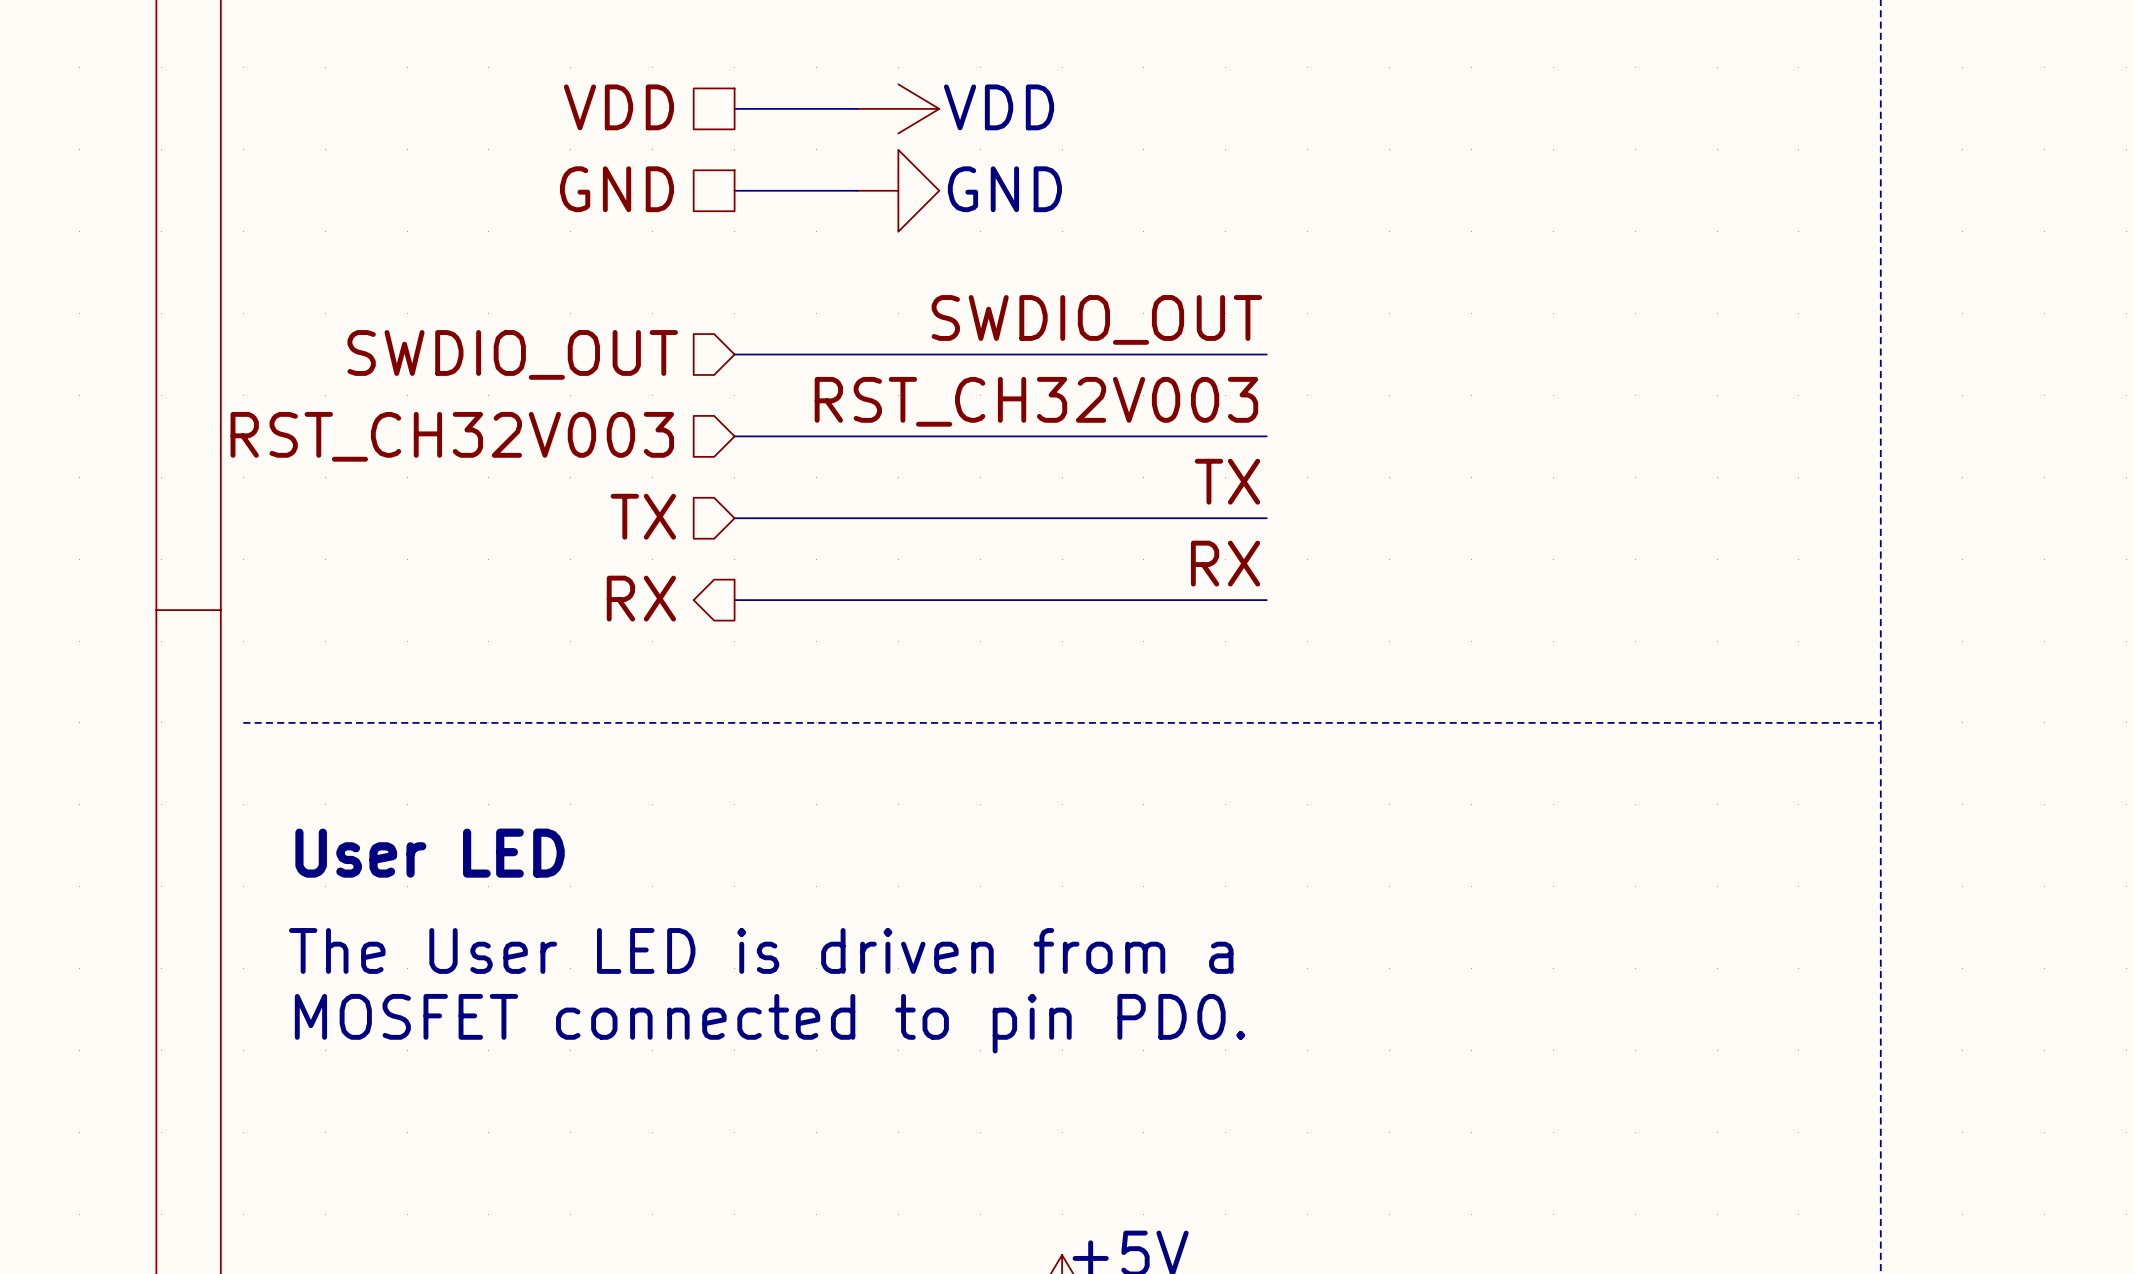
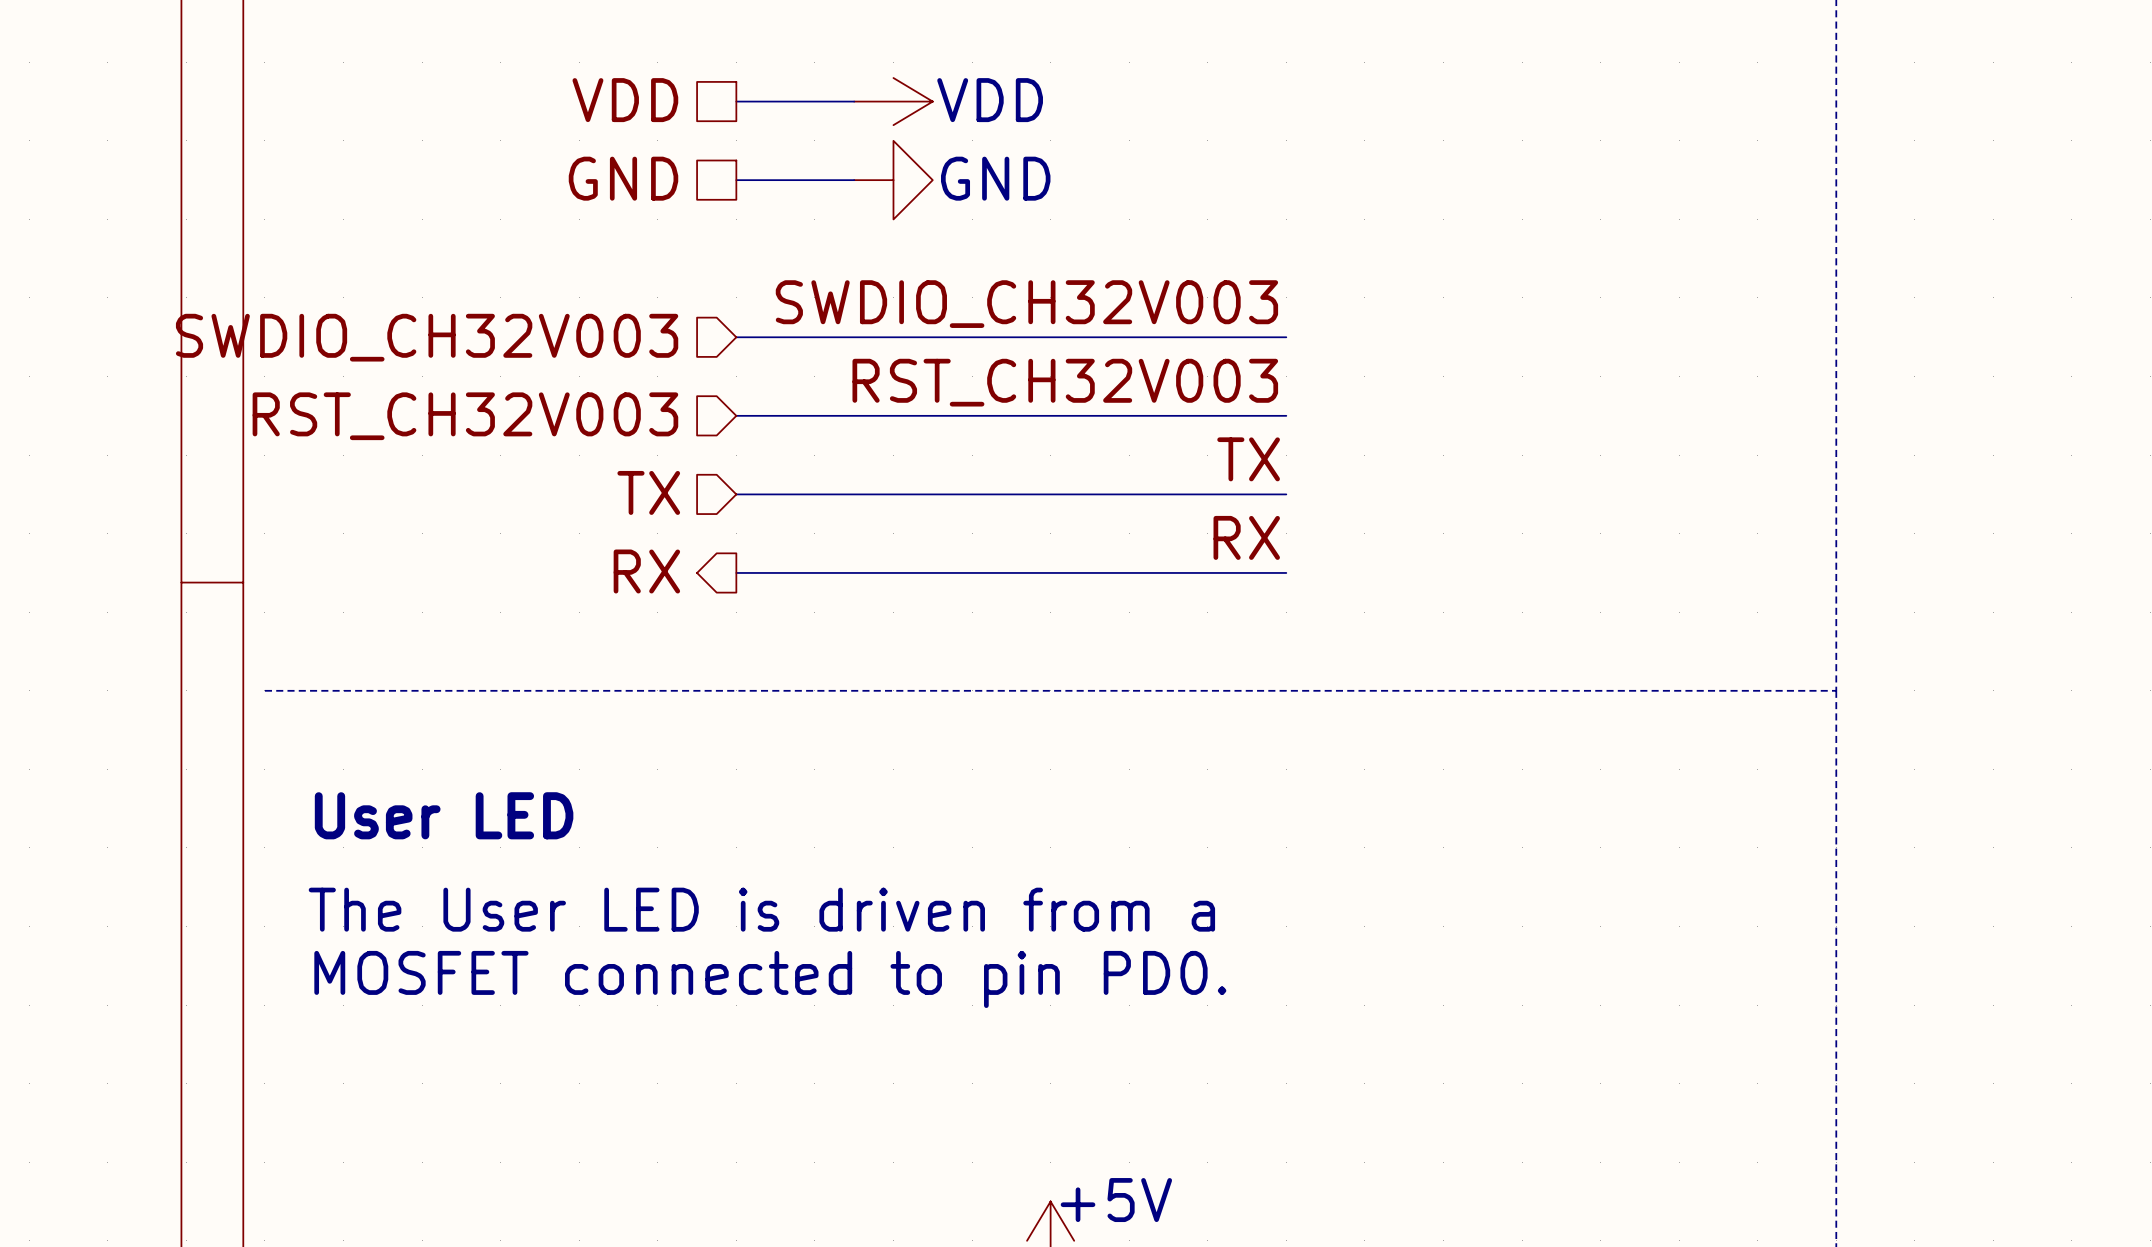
label: none -> SWDIO_CH32V003 (1026, 304)
label: SWDIO_OUT (1096, 319) -> none
hierarchical label: SWDIO_OUT (512, 354) -> SWDIO_CH32V003 (427, 337)
wire: none -> (1247, 337) (1286, 337)
label position: RST_CH32V003 (1036, 401) -> RST_CH32V003 (1065, 382)
wire: none -> (1247, 415) (1286, 415)
label position: TX (1227, 481) -> TX (1248, 459)
wire: none -> (1247, 494) (1286, 494)
label position: RX (1225, 563) -> RX (1246, 537)
wire: none -> (1247, 572) (1286, 572)

